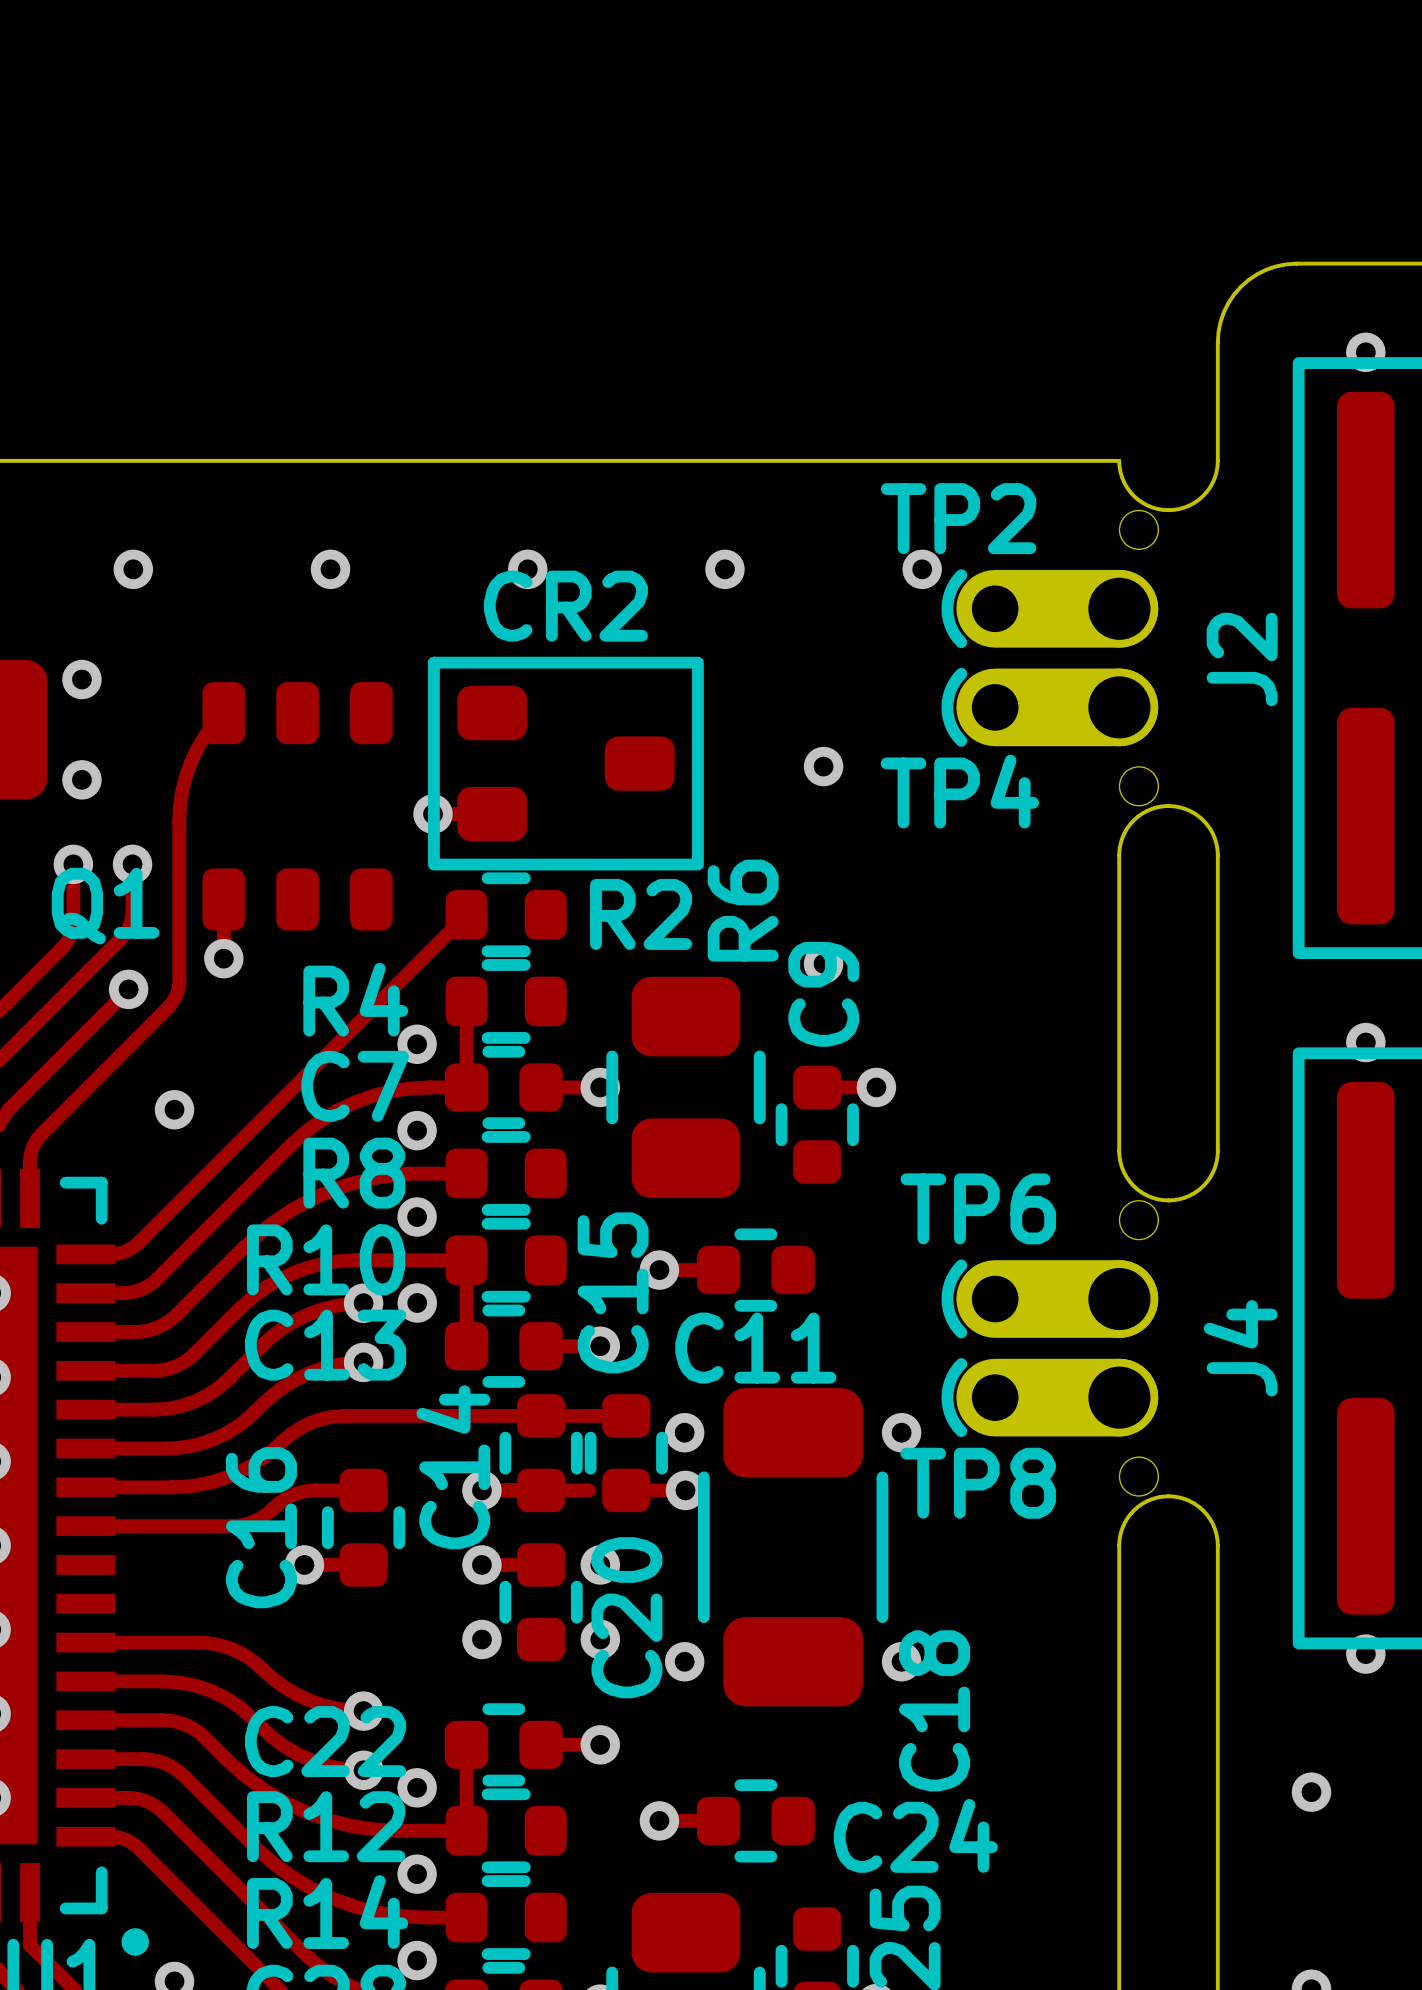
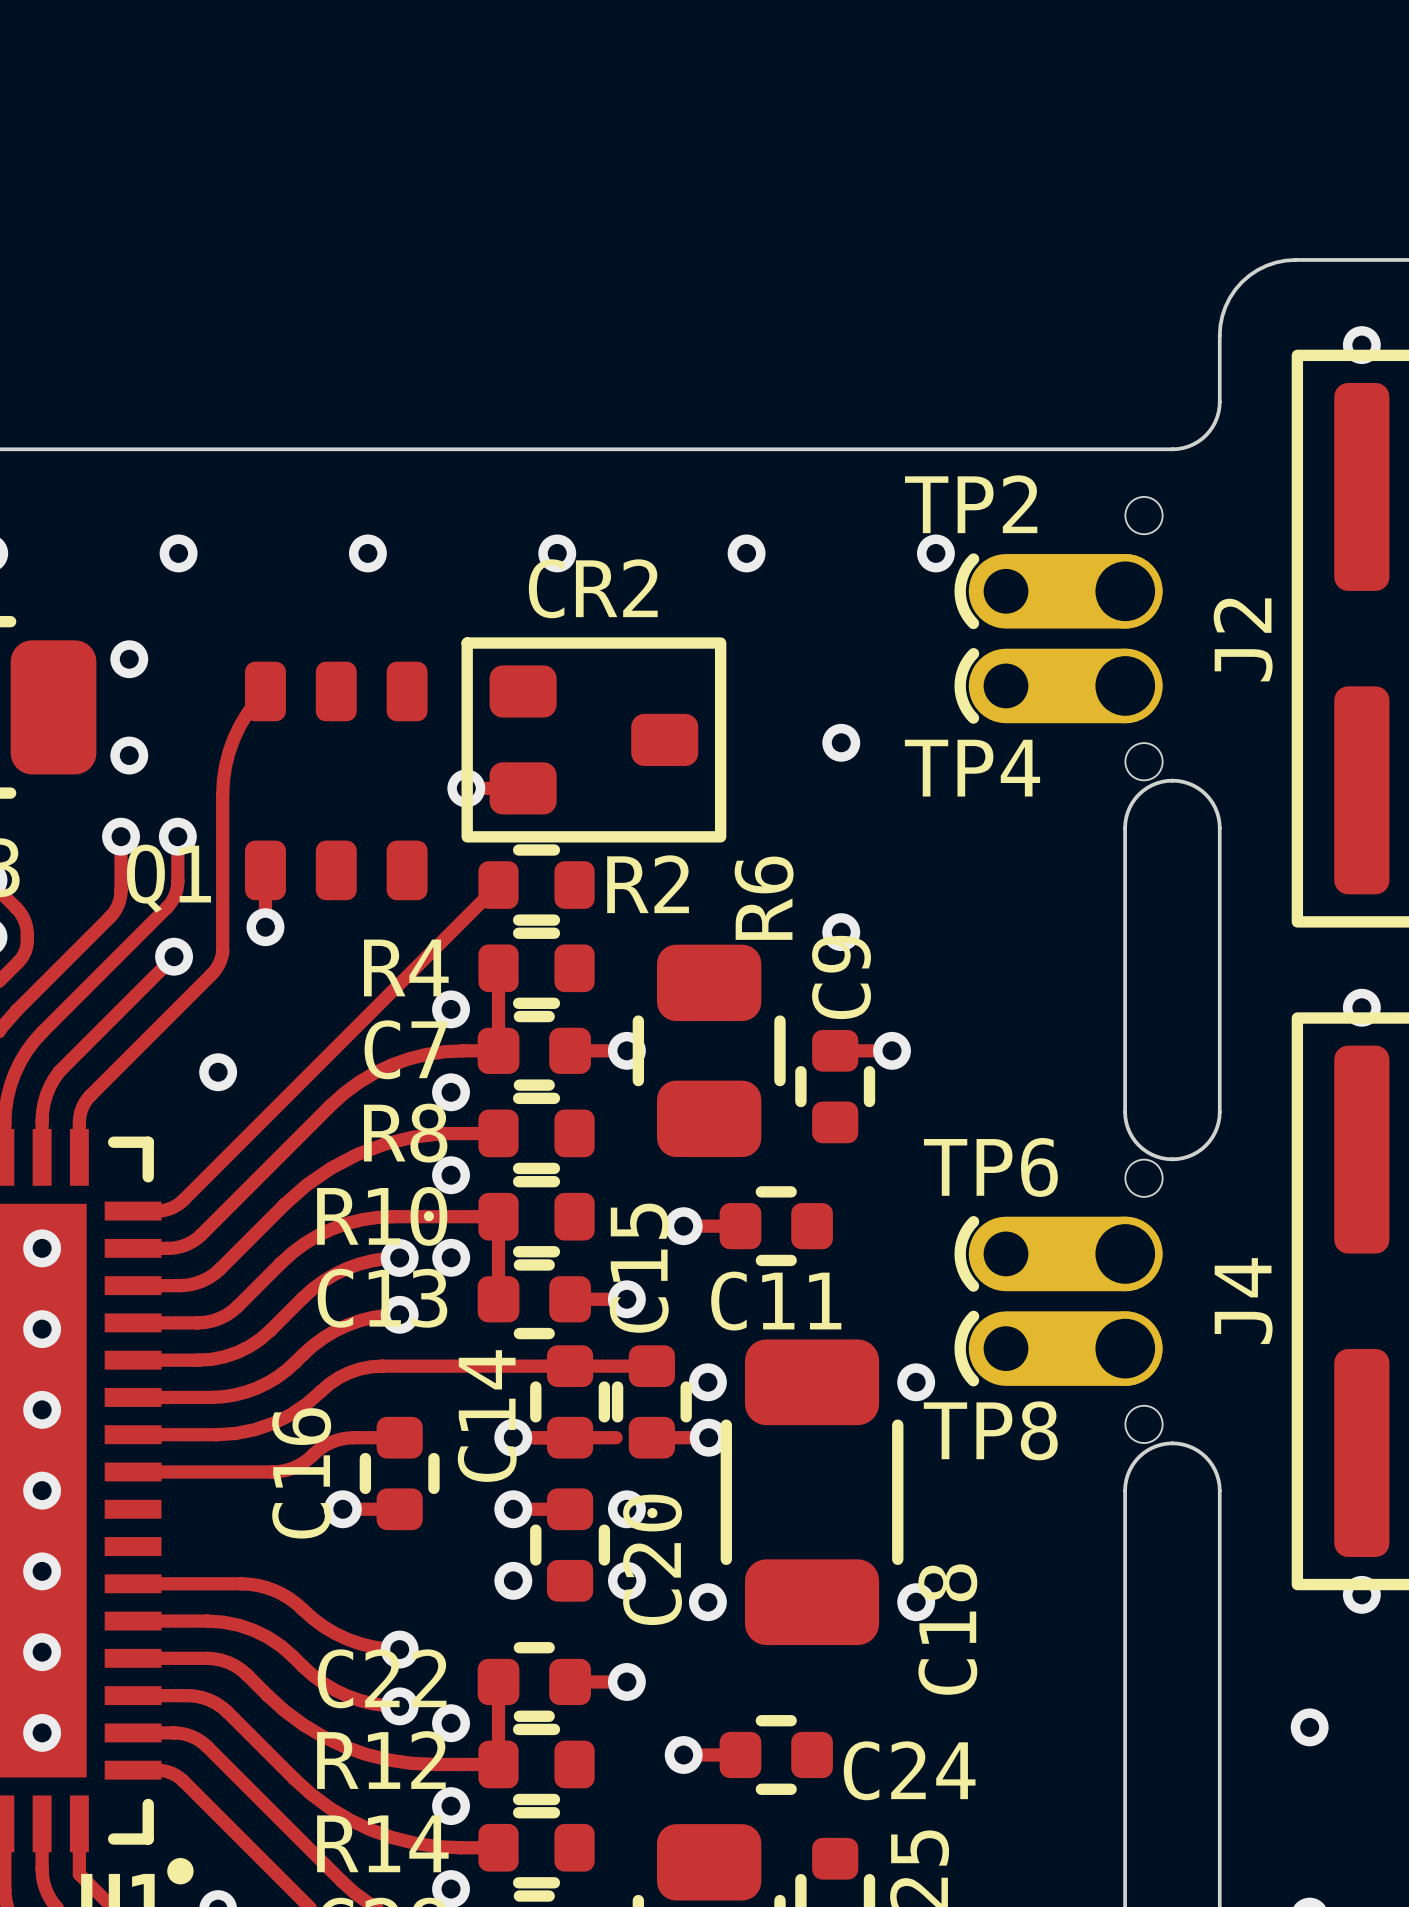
board edge: (1217, 411) (1217, 460) (1215, 477) (1203, 495) (1189, 505) (1179, 508) (1162, 509) (1142, 502) (1133, 495) (1124, 482) (1119, 460) -> (1219, 401) (1217, 417) (1212, 427) (1205, 435) (1192, 444) (1177, 449) (1125, 449)

